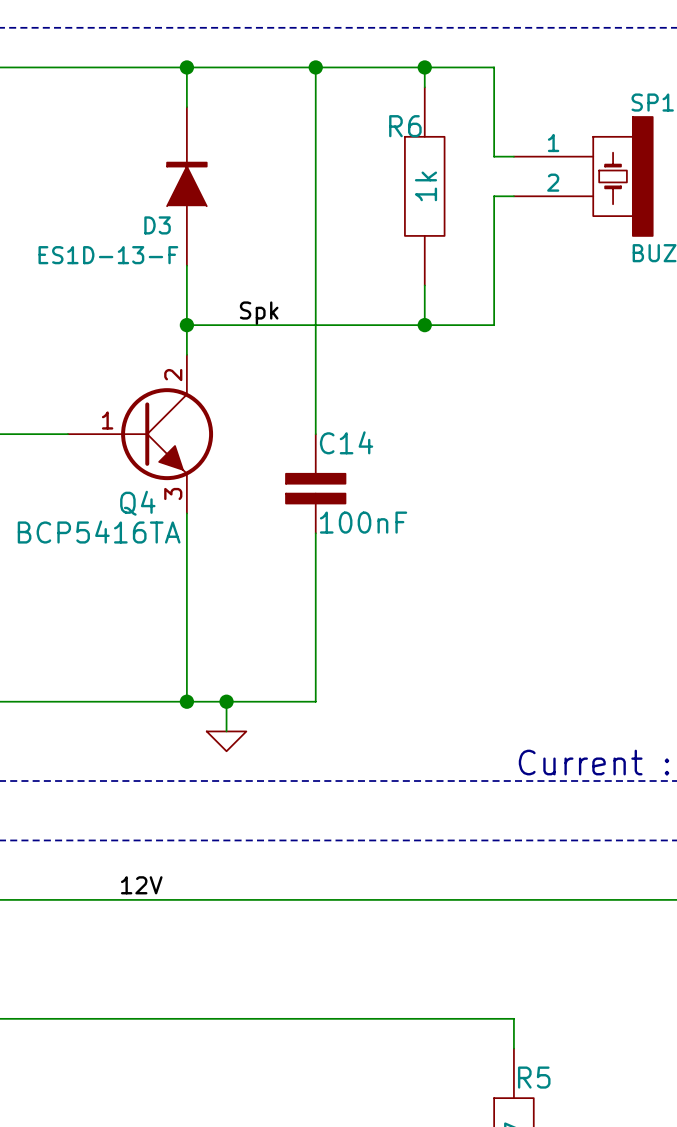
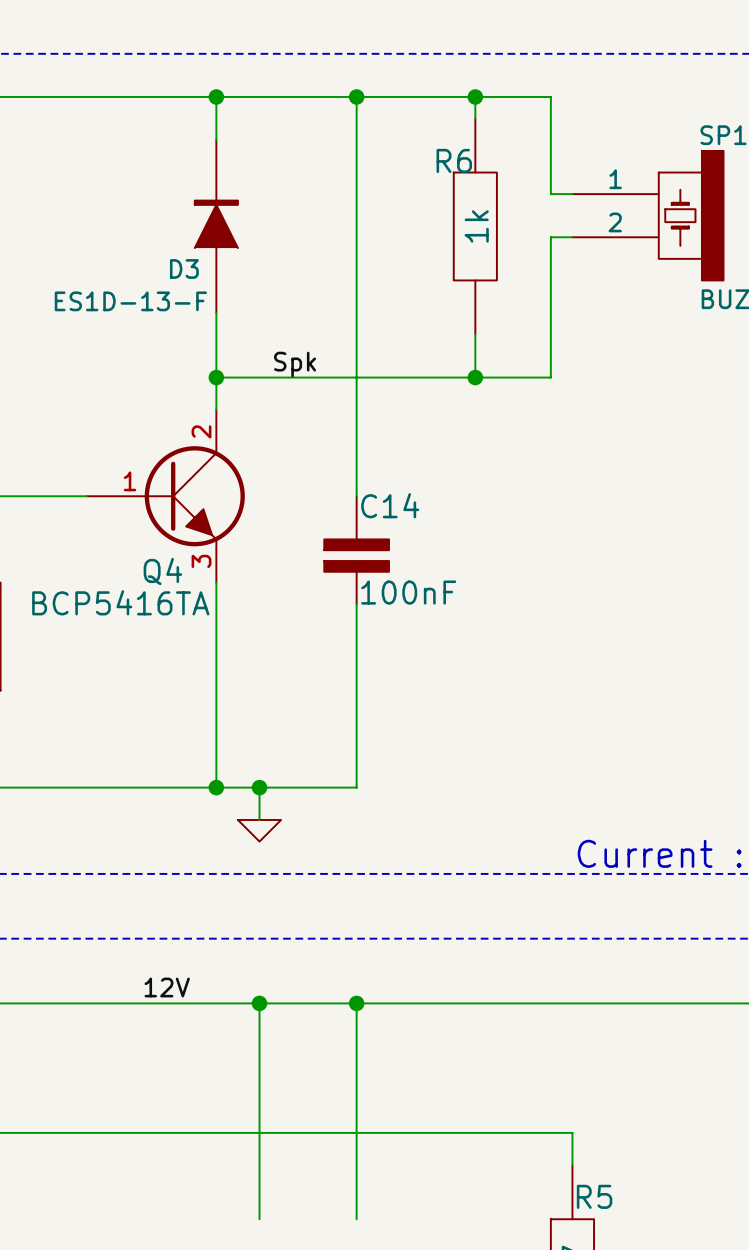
wire: none -> (259, 1003) (259, 1219)
junction: none -> (259, 1003)
wire: none -> (356, 1003) (356, 1219)
junction: none -> (356, 1003)

